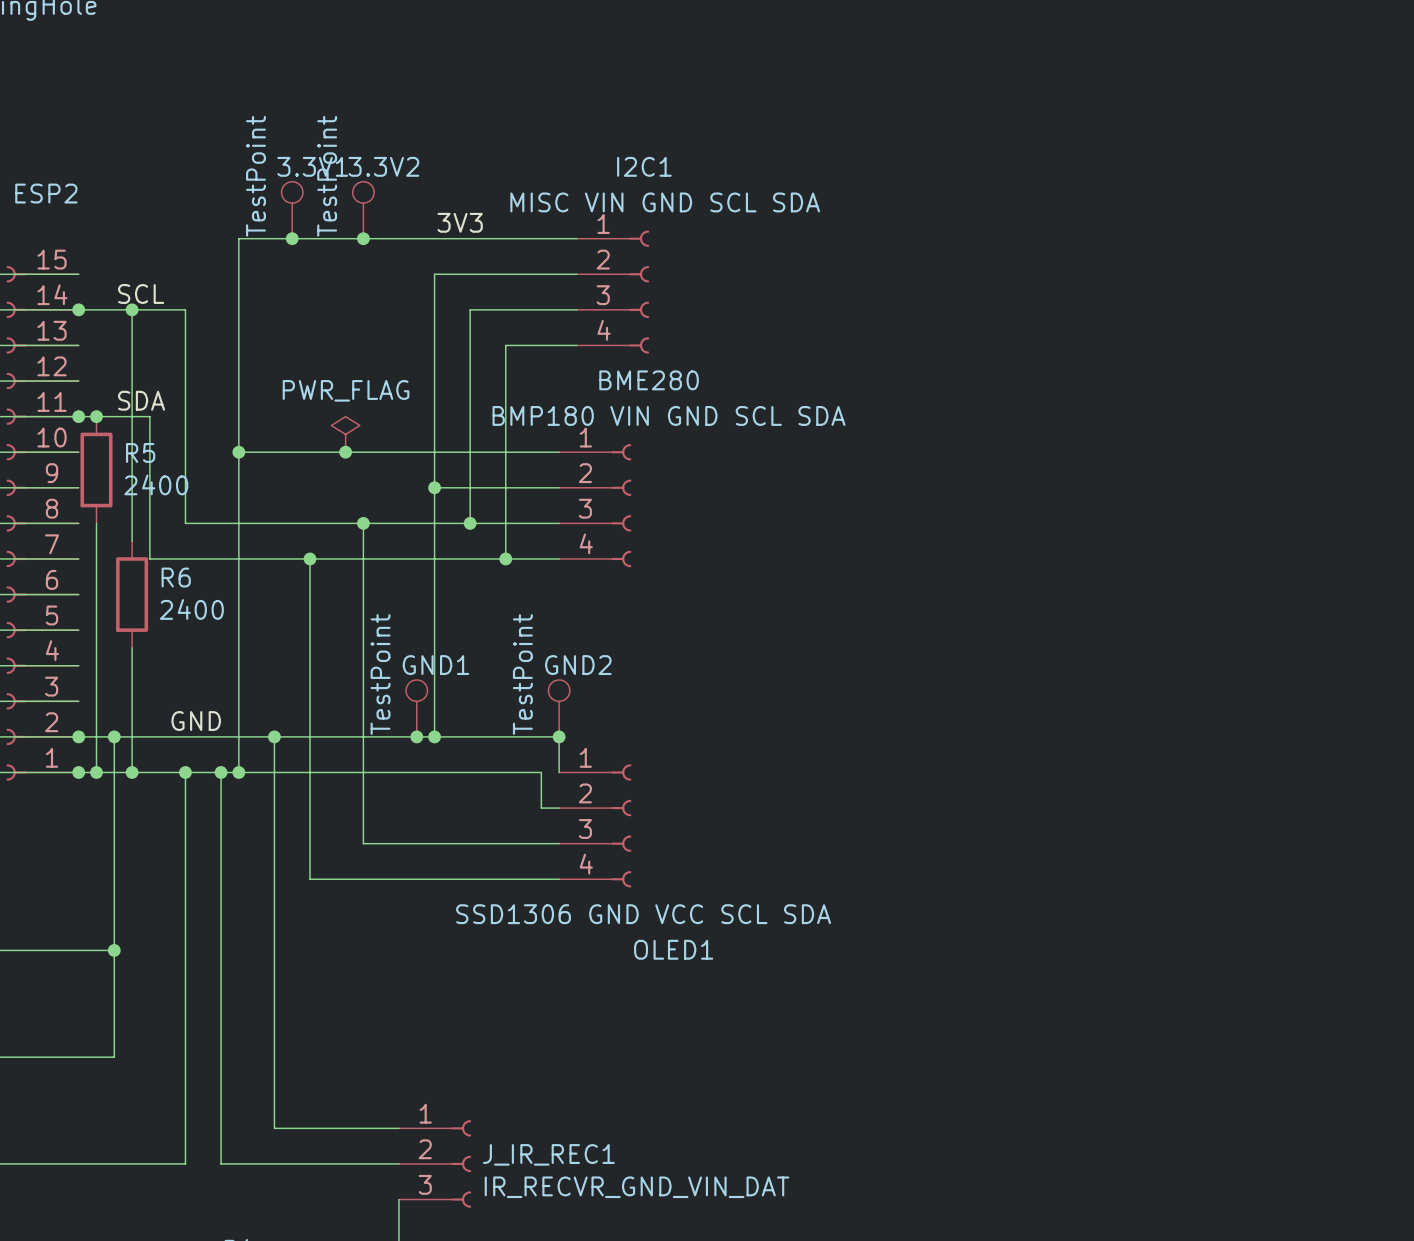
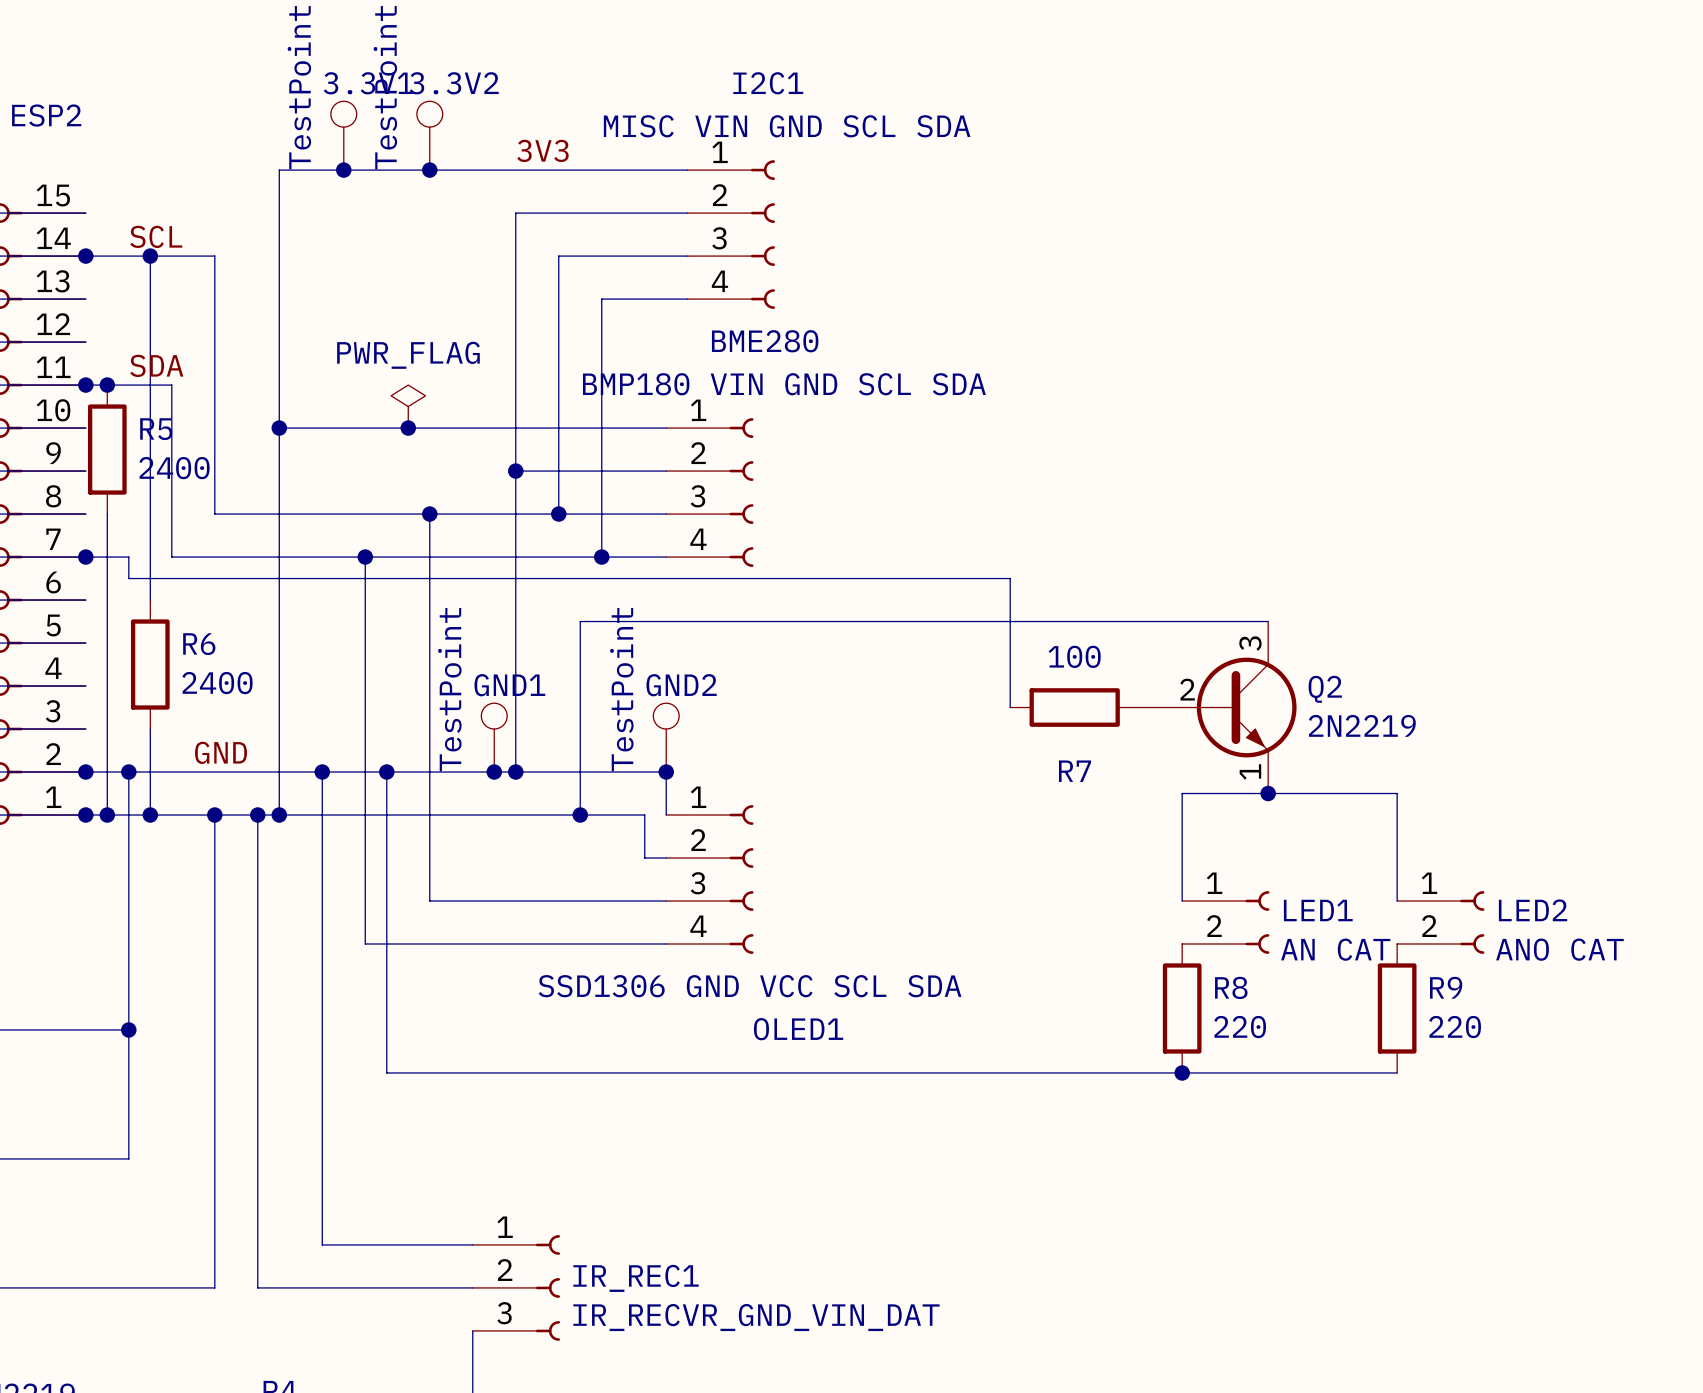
wire: none -> (85, 557) (128, 557) (128, 578) (1010, 578) (1010, 707)
junction: none -> (85, 557)
R6 position: (132, 594) -> (150, 664)
wire: none -> (1268, 621) (580, 621) (580, 815)
wire: (132, 647) (132, 701) -> (150, 535) (150, 600)
R7: none -> 100 (1074, 707)
Q2: none -> 2N2219 (1217, 707)
wire: none -> (386, 772) (386, 1072) (1397, 1072)
junction: none -> (386, 772)
junction: none -> (1268, 793)
junction: none -> (580, 815)
wire: none -> (1182, 901) (1182, 793) (1397, 793) (1397, 901)
LED1: none -> AN CAT (1225, 922)
LED2: none -> ANO CAT (1440, 922)
R8: none -> 220 (1182, 1008)
R9: none -> 220 (1397, 1008)
junction: none -> (1182, 1072)
J_IR_REC1 name: J_IR_REC1 (548, 1154) -> IR_REC1 (636, 1278)

